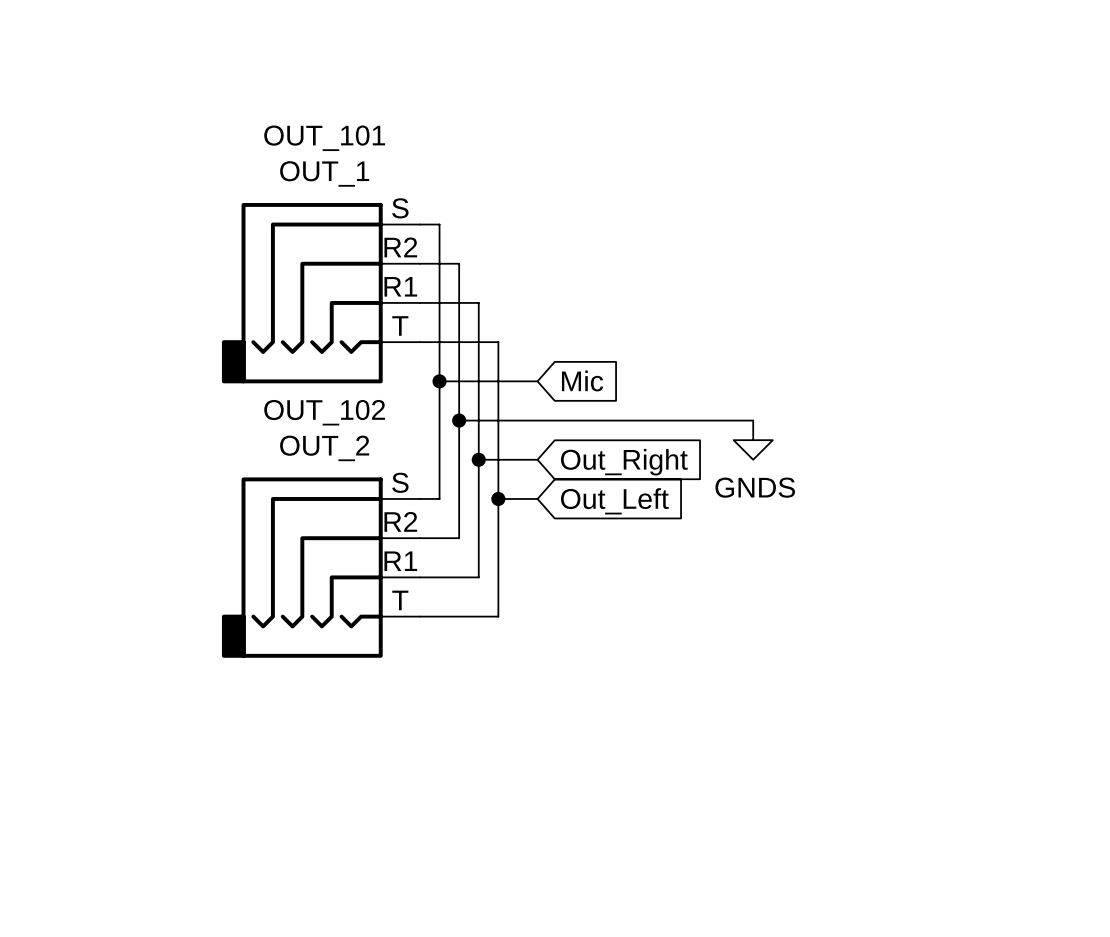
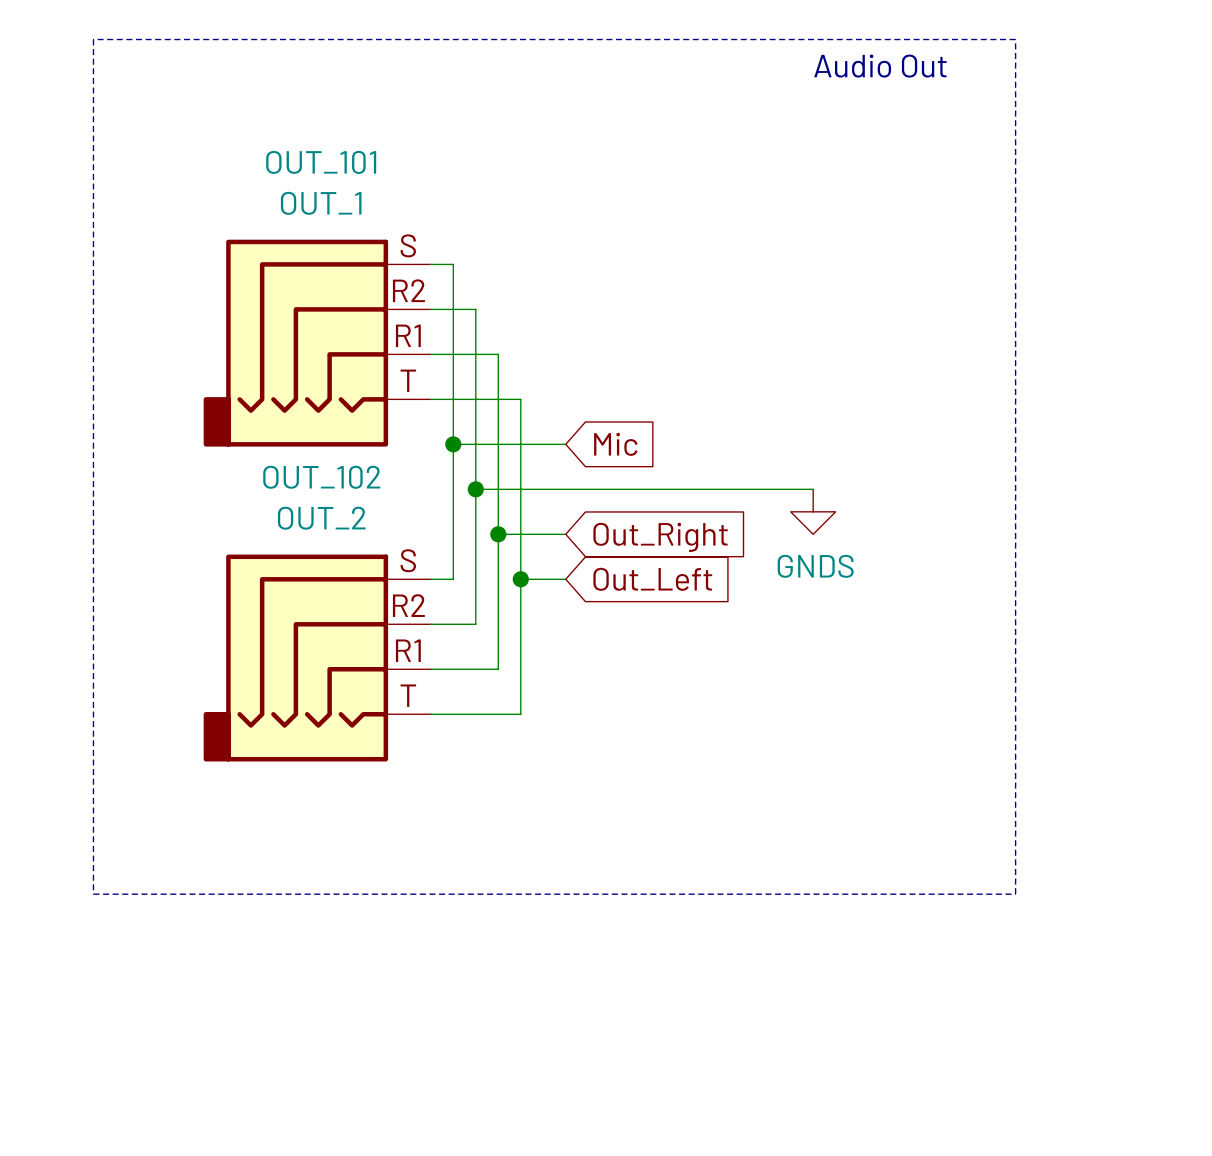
line: none -> (93, 39) (93, 894) (1015, 894) (1015, 39) (93, 39)
text: none -> Audio Out (880, 66)

